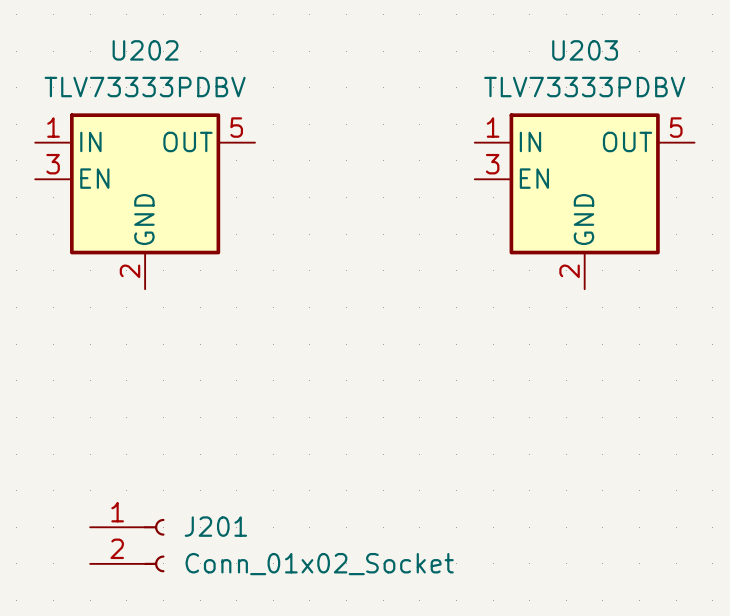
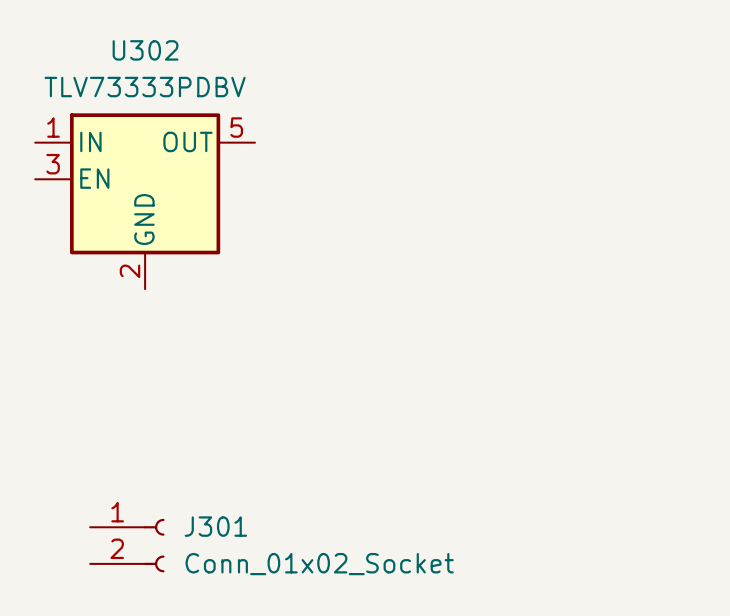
U202 name: U202 (145, 50) -> U302 (145, 50)
U203: TLV73333PDBV (584, 201) -> none
J201 name: J201 (215, 526) -> J301 (215, 526)

